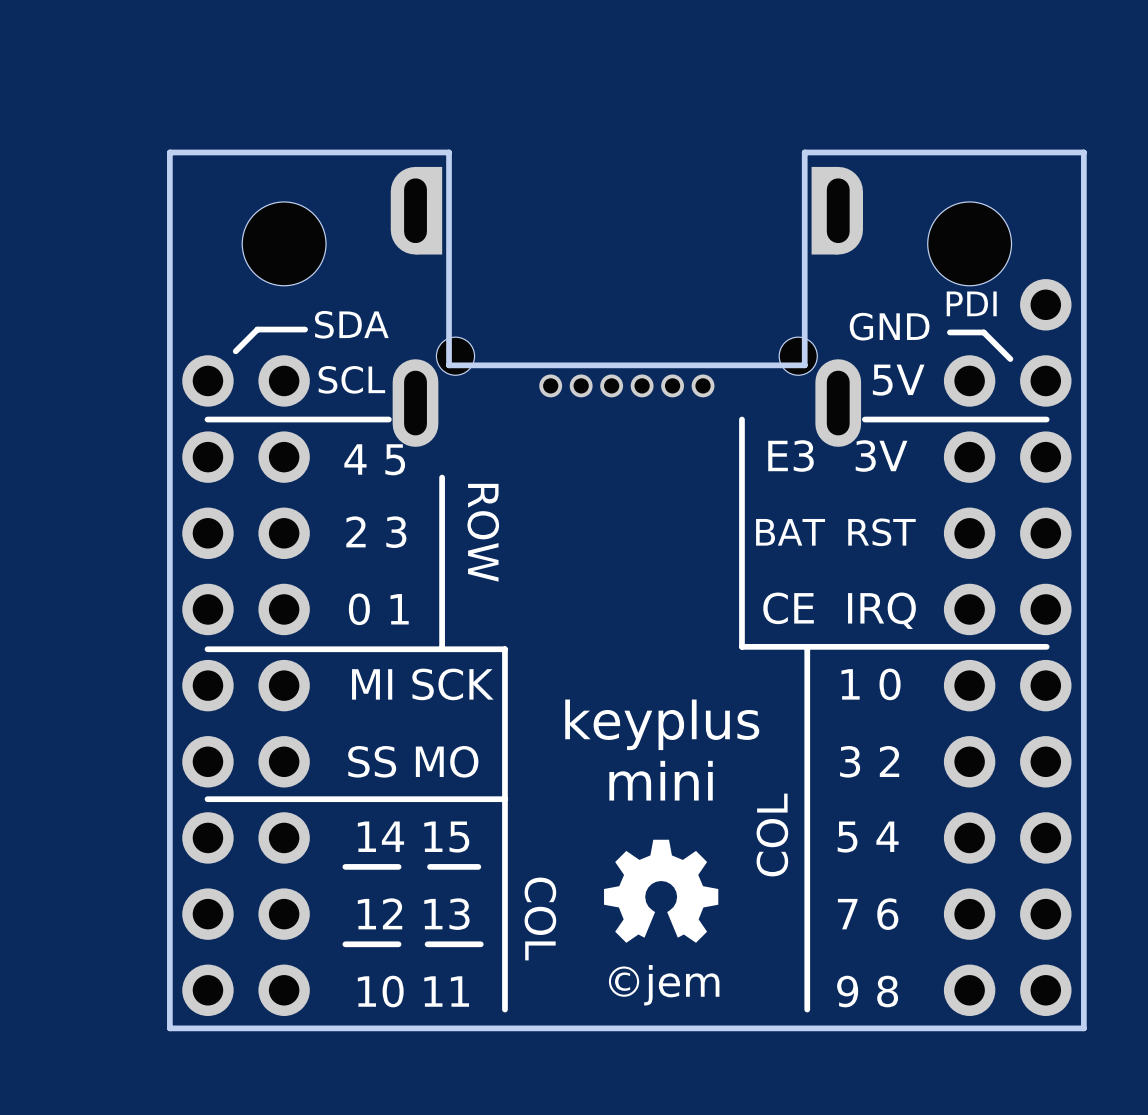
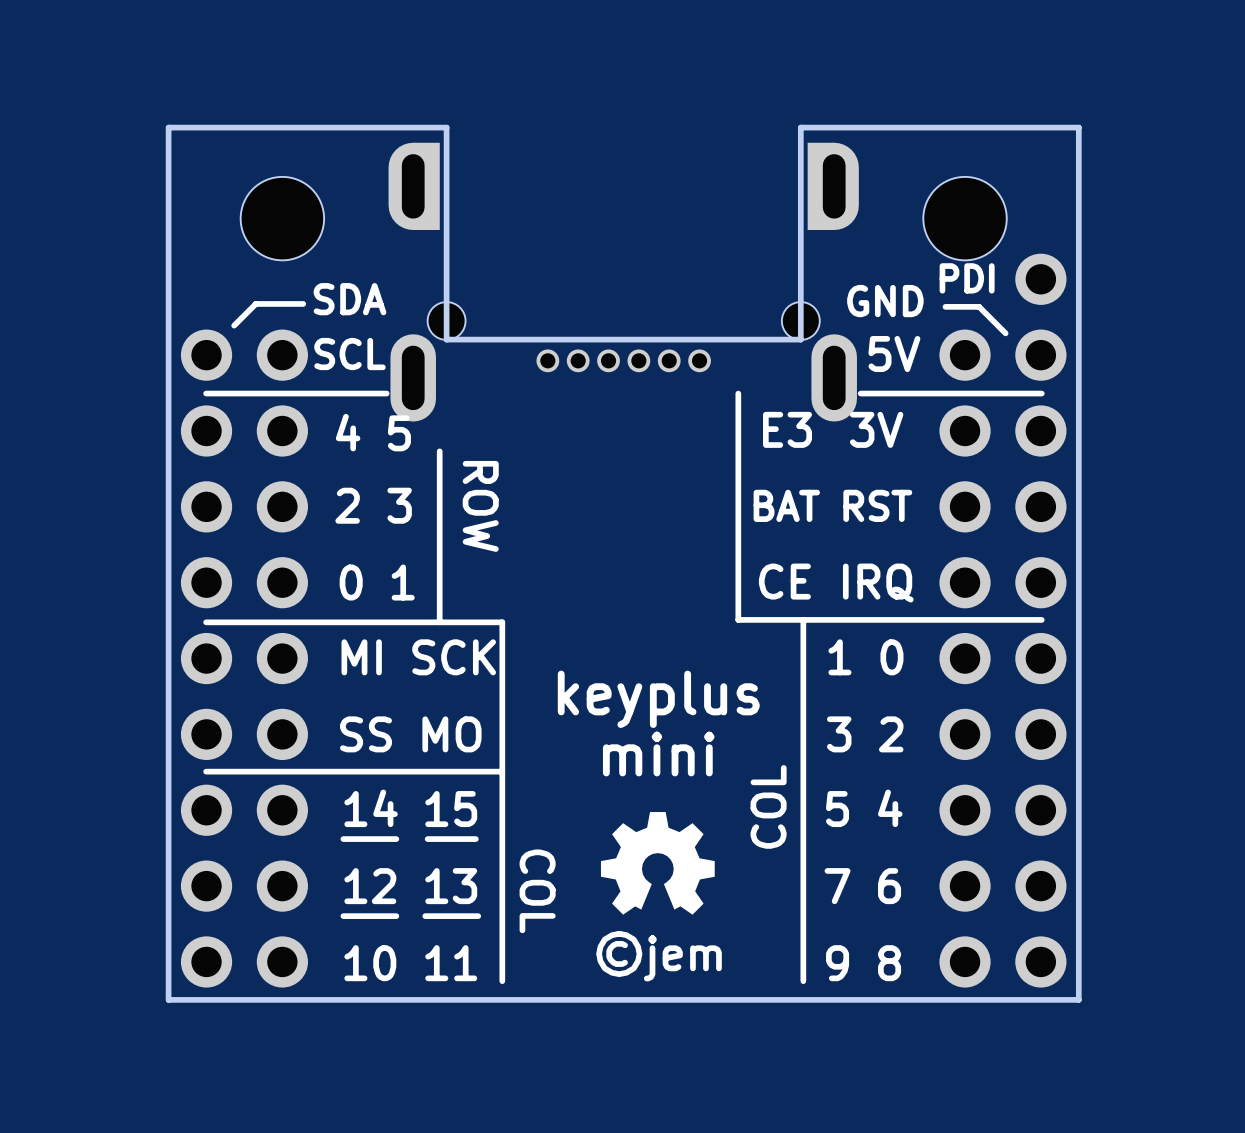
part footprint: [390, 166, 863, 447] -> [388, 142, 859, 422]

